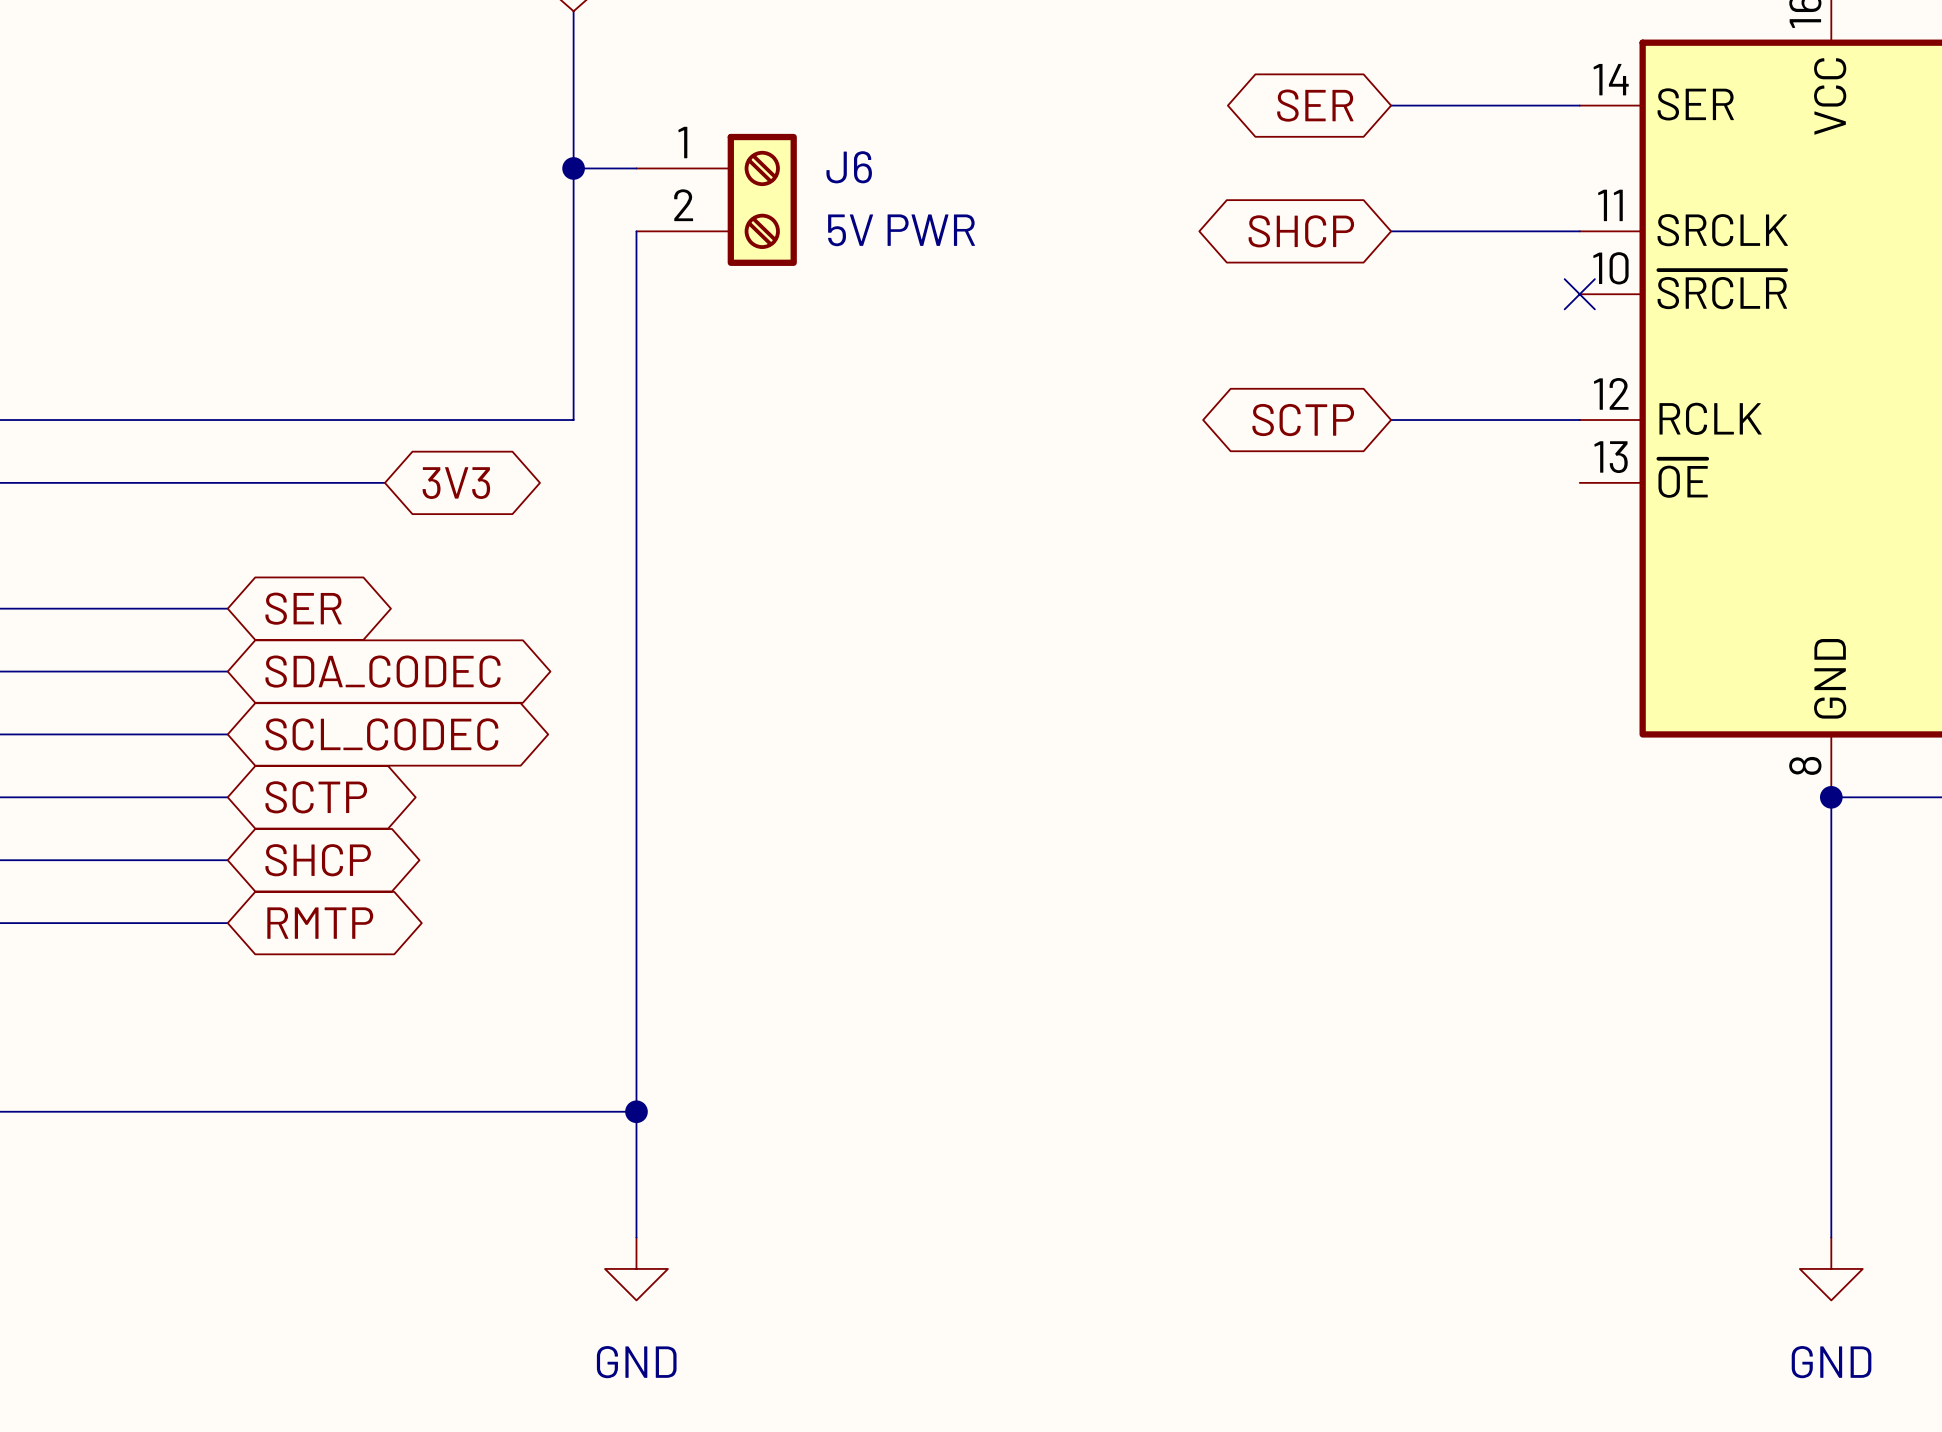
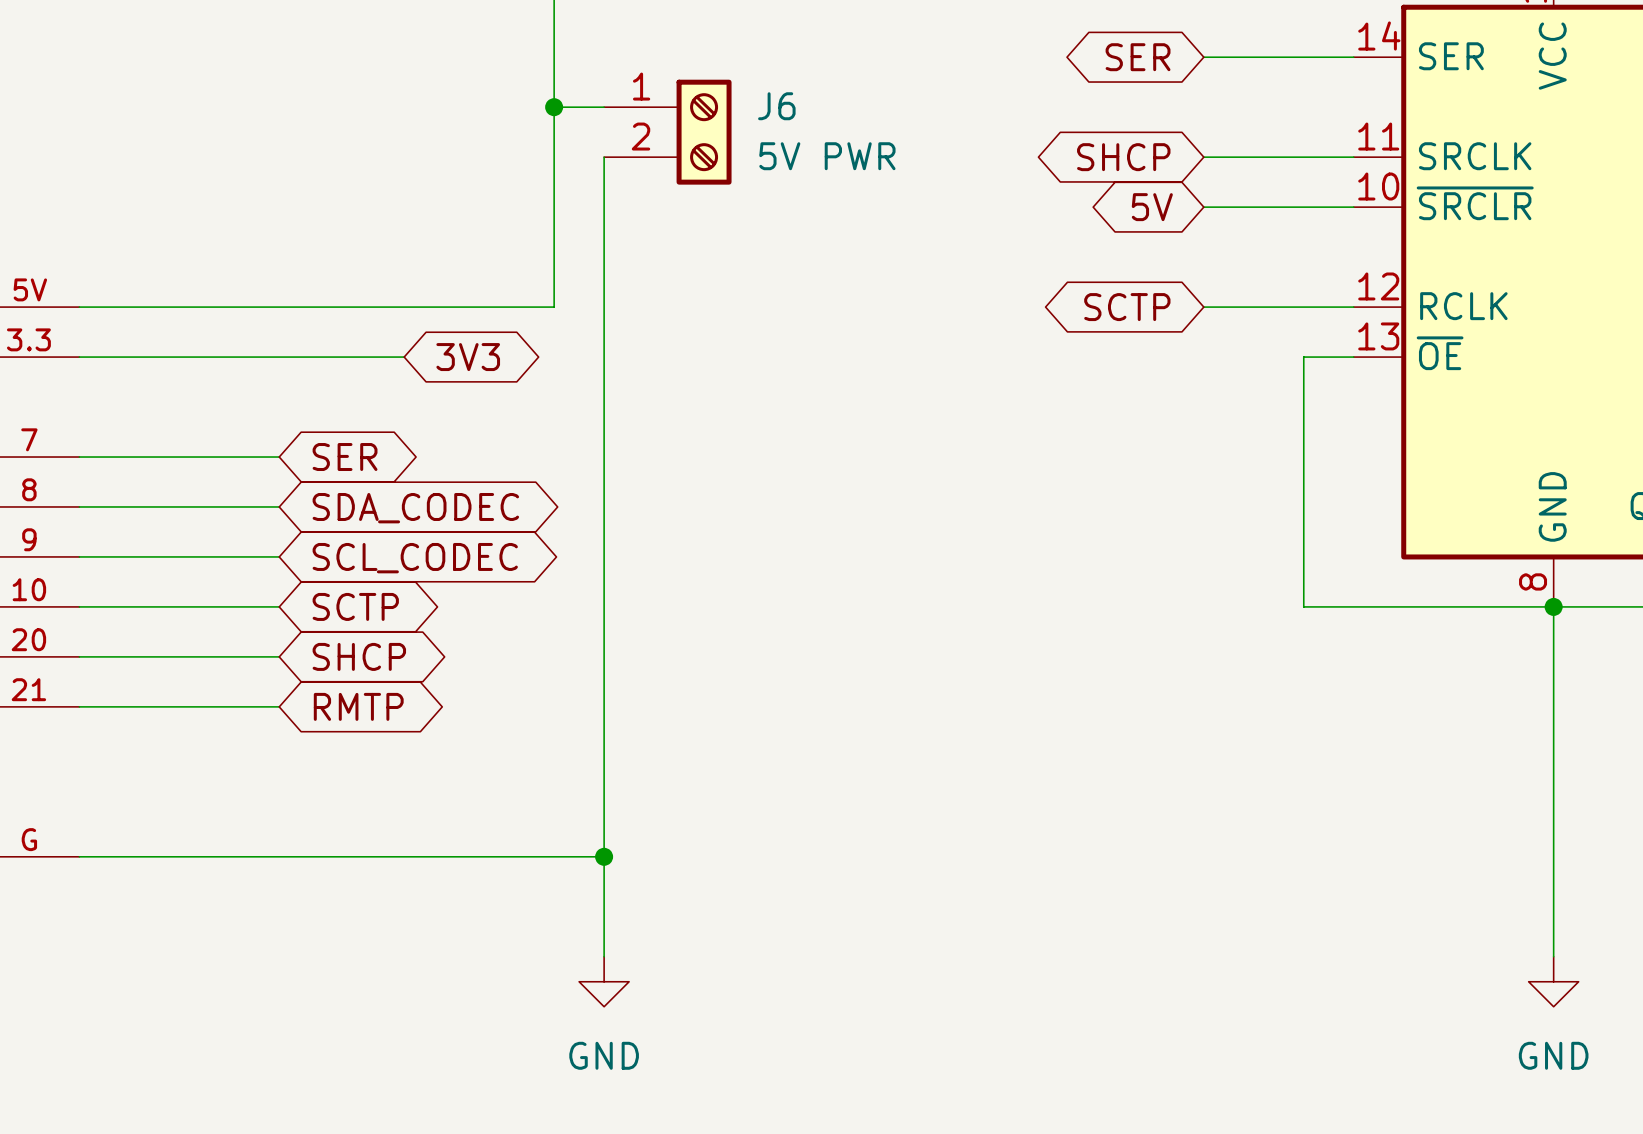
global label: none -> 5V (1152, 207)
wire: none -> (1203, 207) (1353, 207)
no-connect mark: (1579, 294) -> none
wire: none -> (1353, 357) (1303, 357) (1303, 606) (1553, 606)

